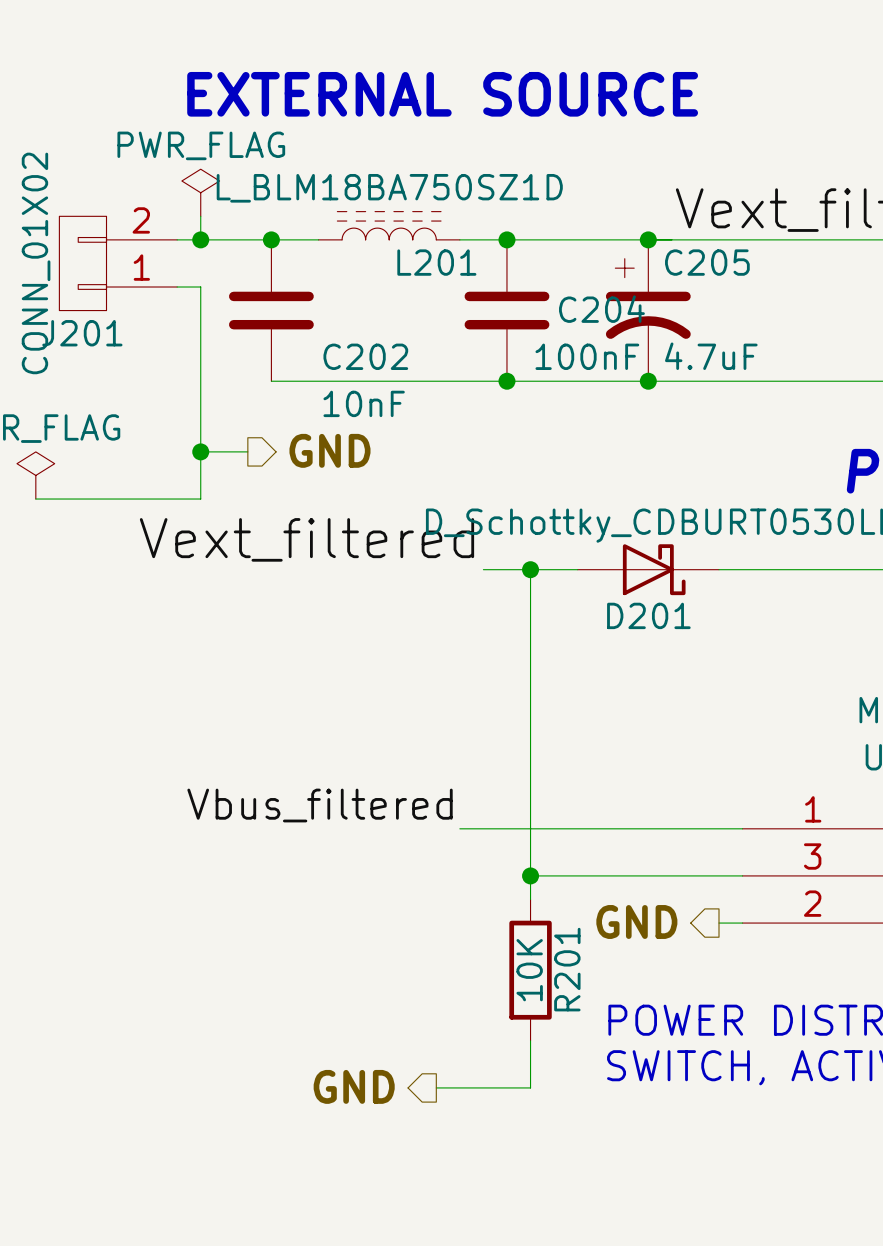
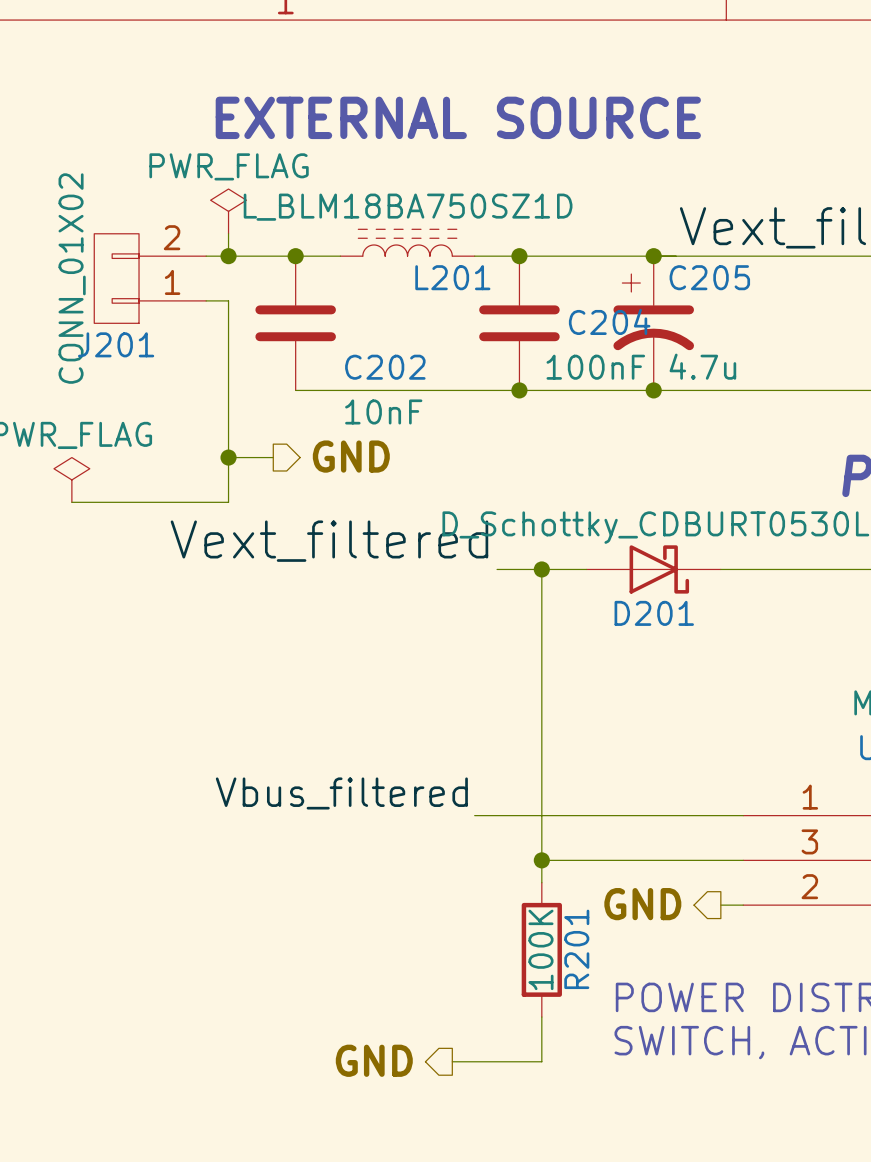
C205 value: 4.7uF (711, 356) -> 4.7u (702, 366)
R201 value: 10K (529, 970) -> 100K (540, 949)

